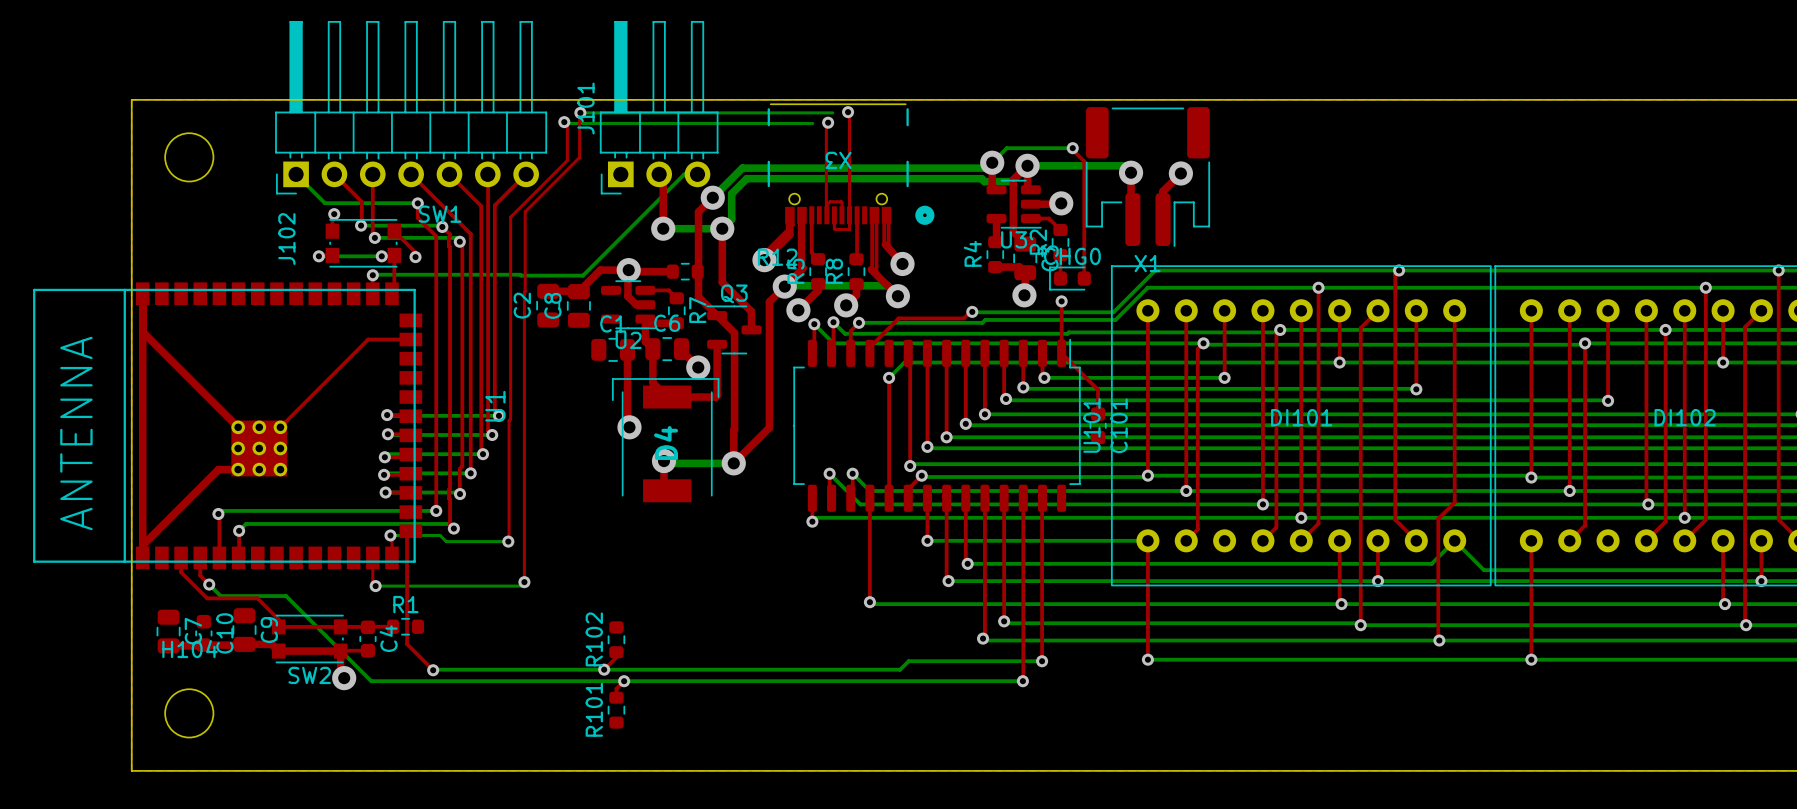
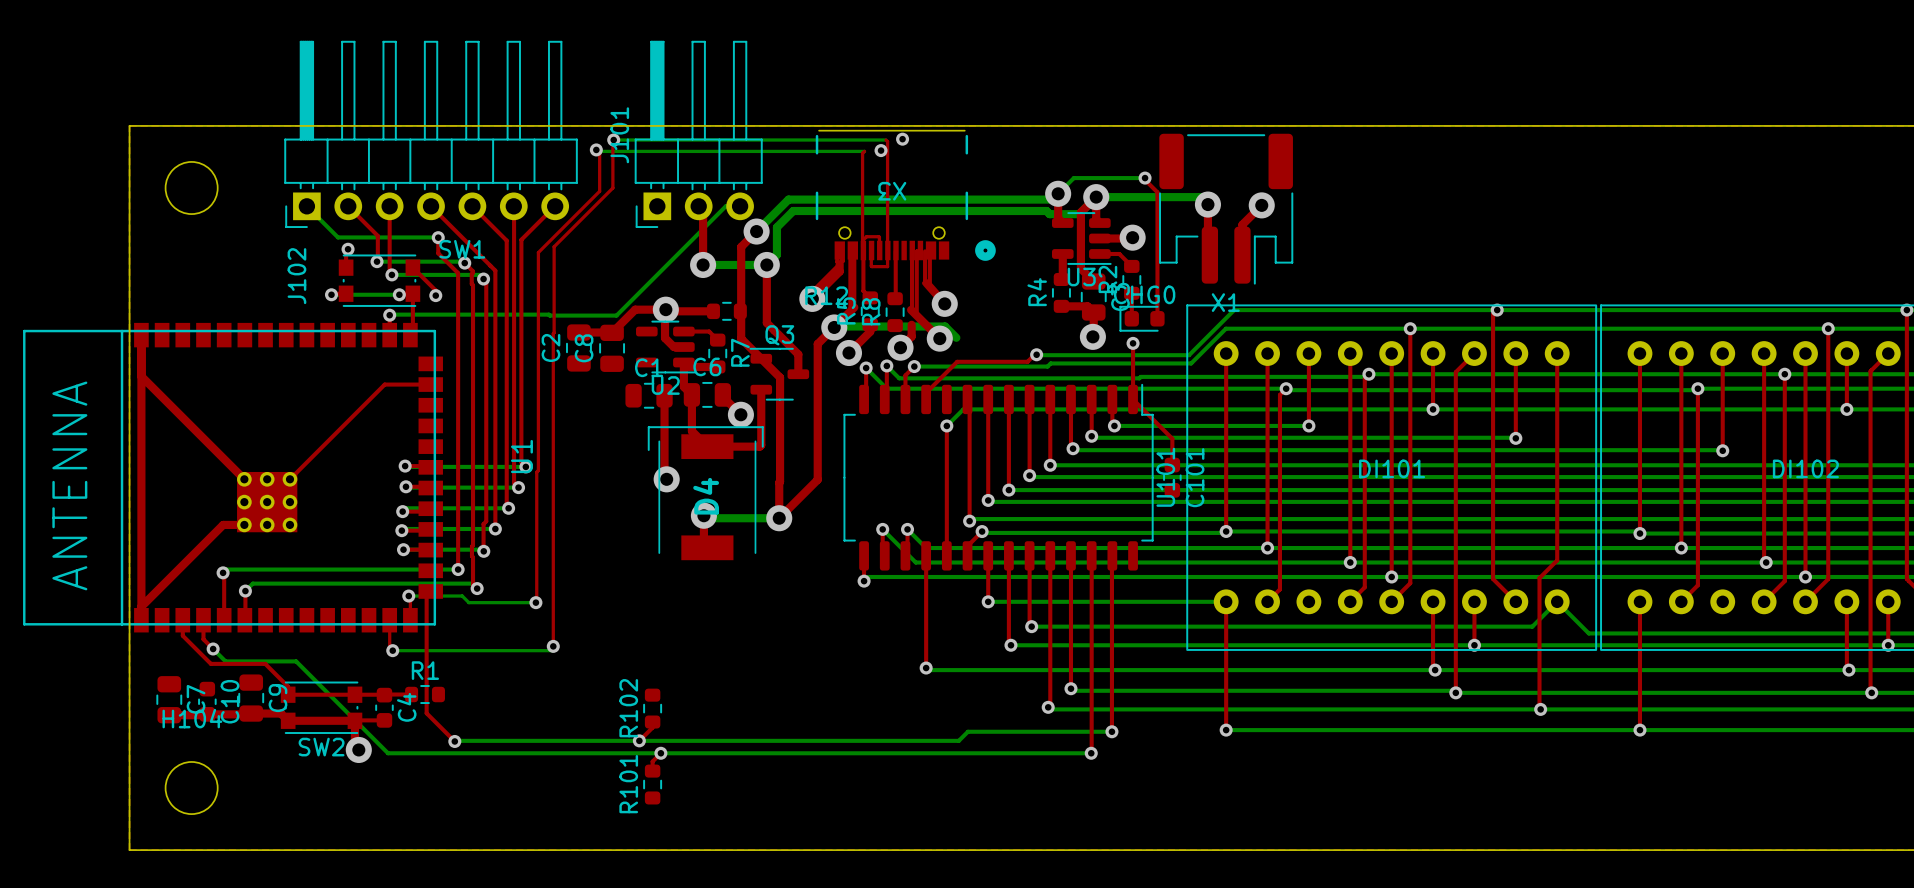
top track: (848, 112) (849, 229) (835, 229) (834, 215) -> (886, 140) (887, 141) (887, 266) (871, 266) (871, 251)
top track: (828, 122) (826, 124) (827, 212) -> (864, 151) (862, 153) (863, 248)
top track: (826, 215) (826, 204) (830, 201) (841, 202) (841, 215) -> (863, 251) (863, 240) (866, 236) (879, 237) (879, 251)
top track: (857, 215) (856, 259) -> (895, 251) (895, 298)
top track: (872, 215) (871, 269) (897, 296) (876, 274) (876, 215) -> (912, 251) (911, 309) (939, 338) (916, 315) (916, 251)
top track: (884, 215) (883, 244) -> (925, 251) (924, 283)
top track: (888, 215) (888, 250) (902, 263) (885, 244) -> (929, 251) (929, 288) (944, 303) (926, 283)
via position: (902, 263) -> (944, 303)
R8 position: (856, 271) -> (895, 312)
via position: (897, 296) -> (939, 338)

